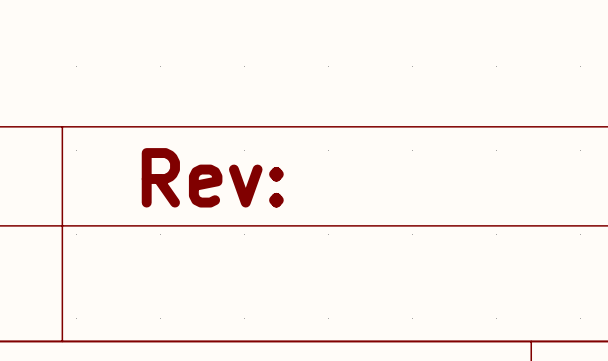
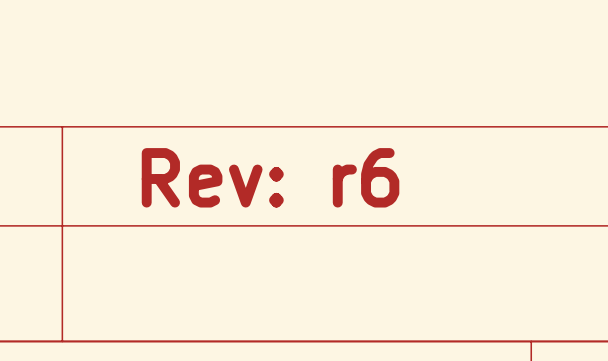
title block: Rev: (212, 177) -> Rev: r6 (270, 177)

